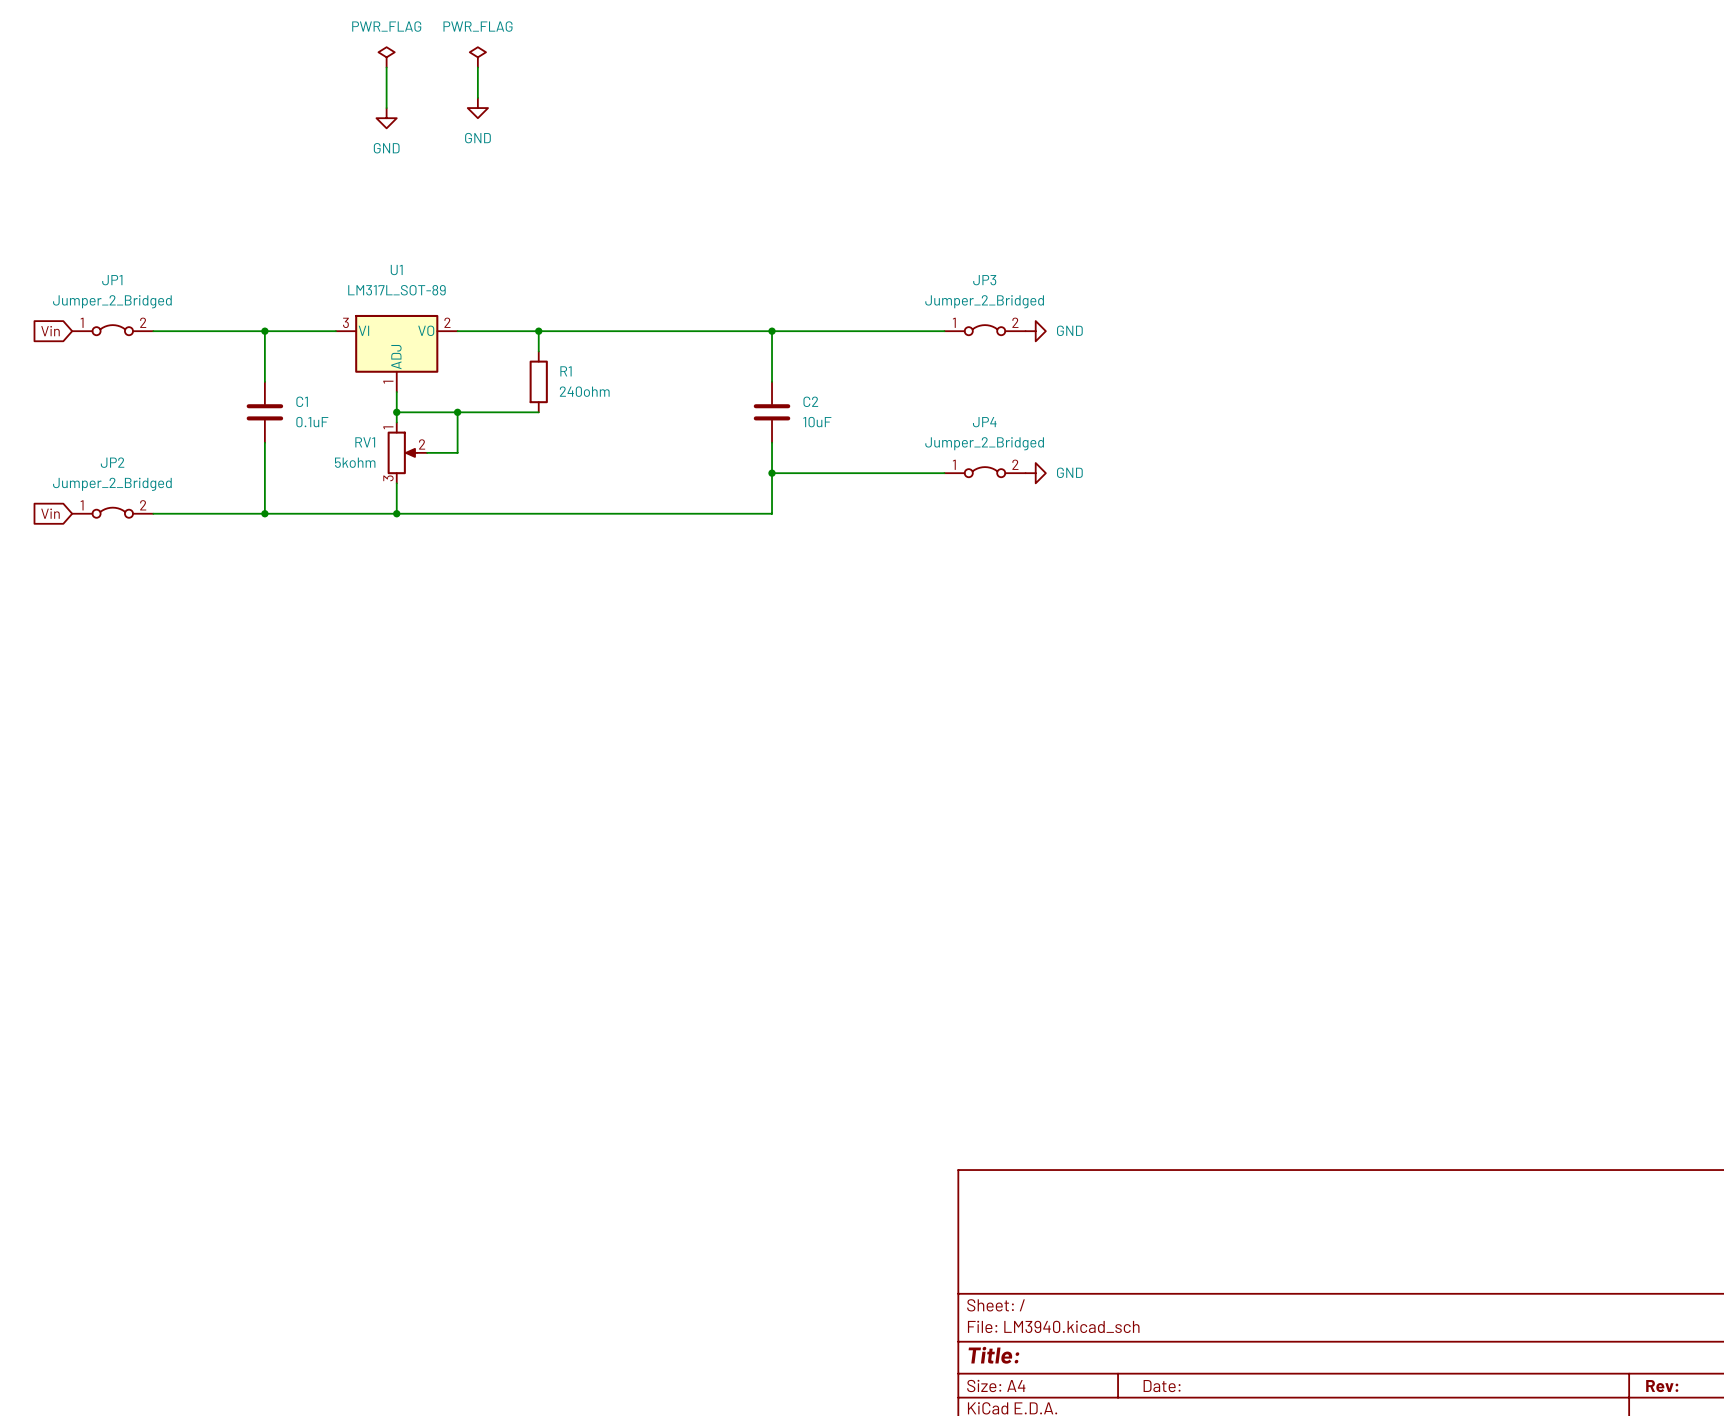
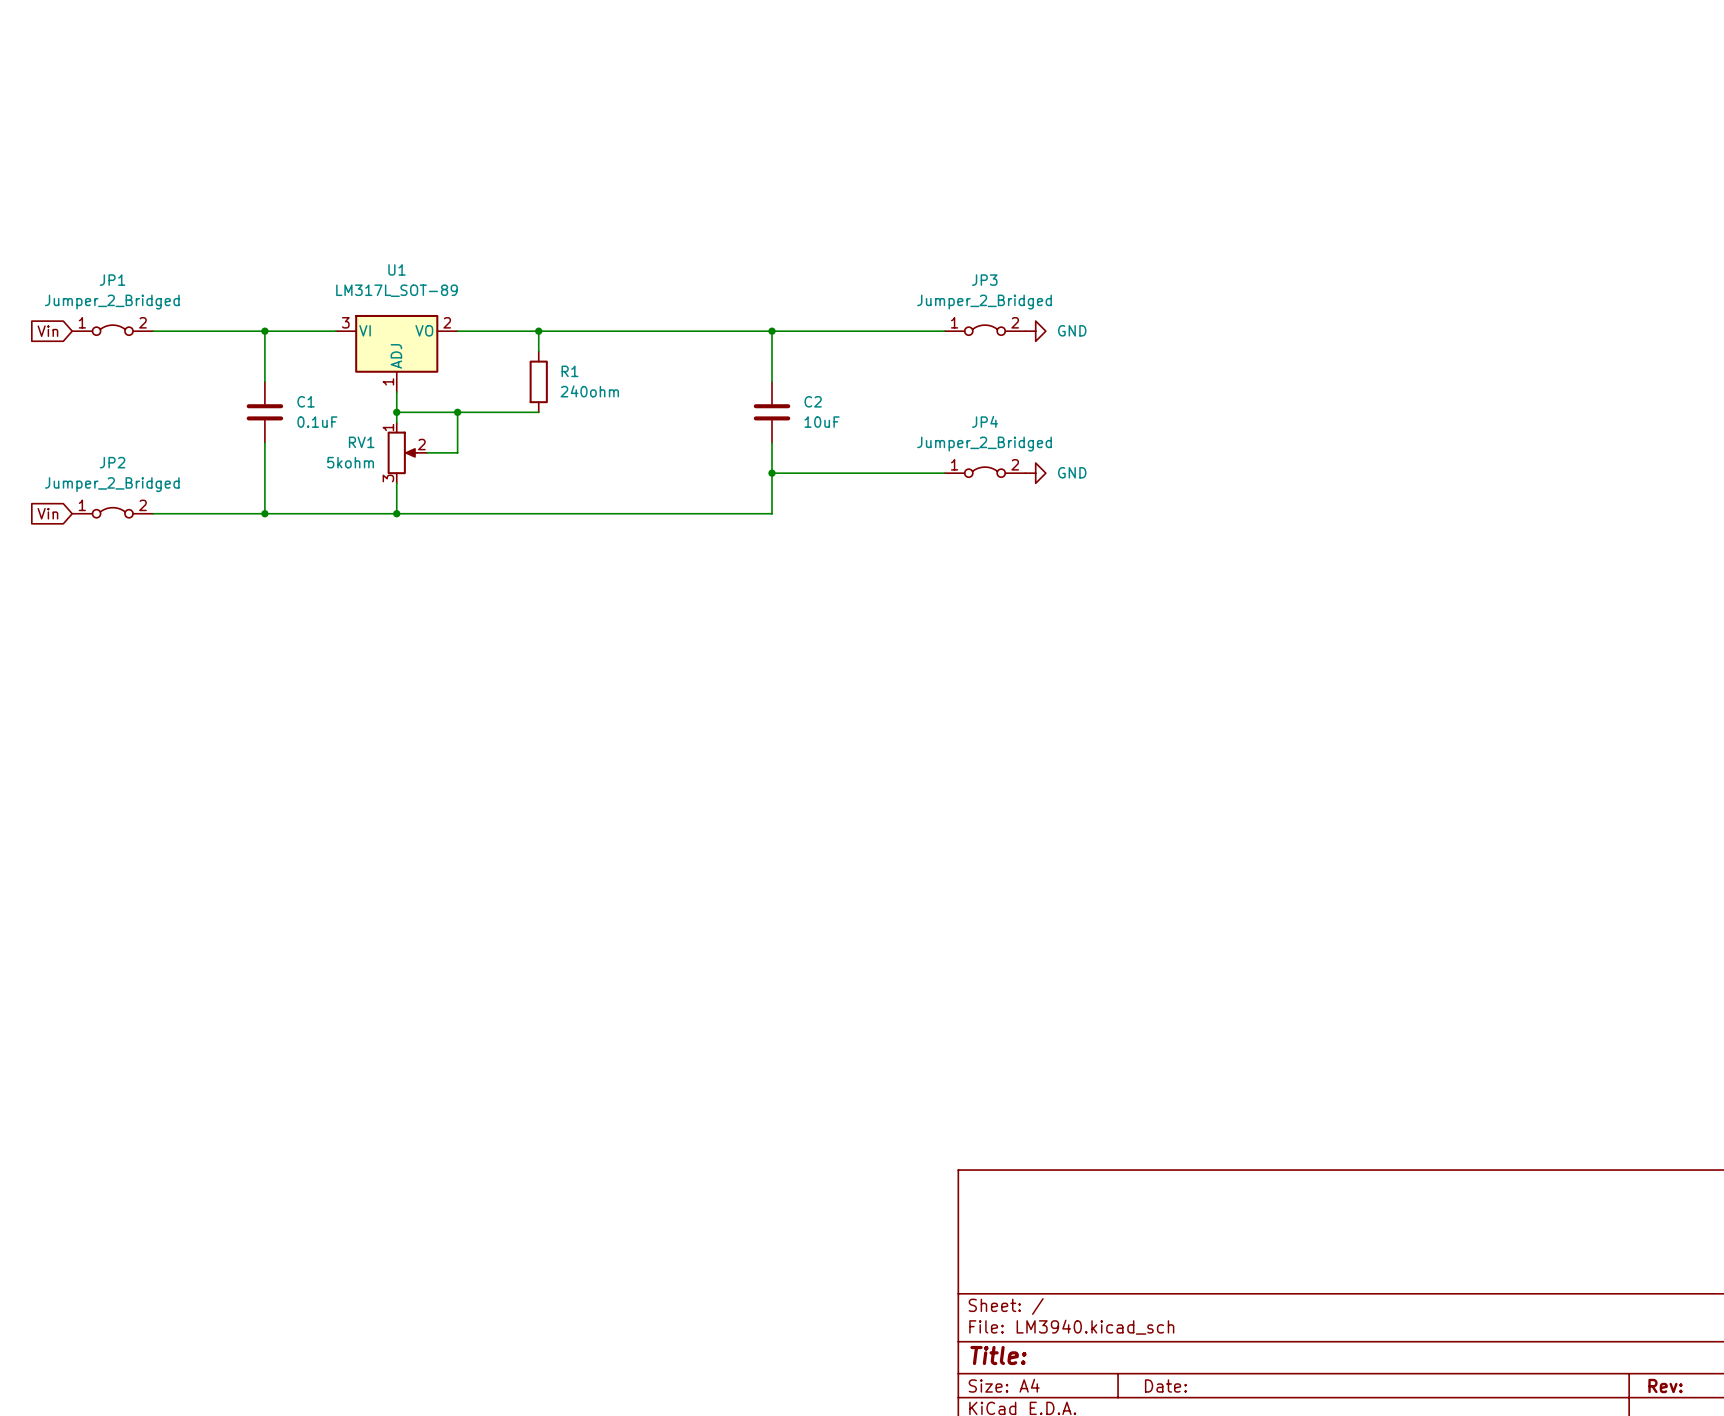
power symbol: PWR_FLAG (386, 57) -> none
power symbol: PWR_FLAG (477, 57) -> none
wire: (386, 67) (386, 108) -> none
wire: (477, 67) (477, 97) -> none
power symbol: GND (477, 108) -> none
power symbol: GND (386, 118) -> none

